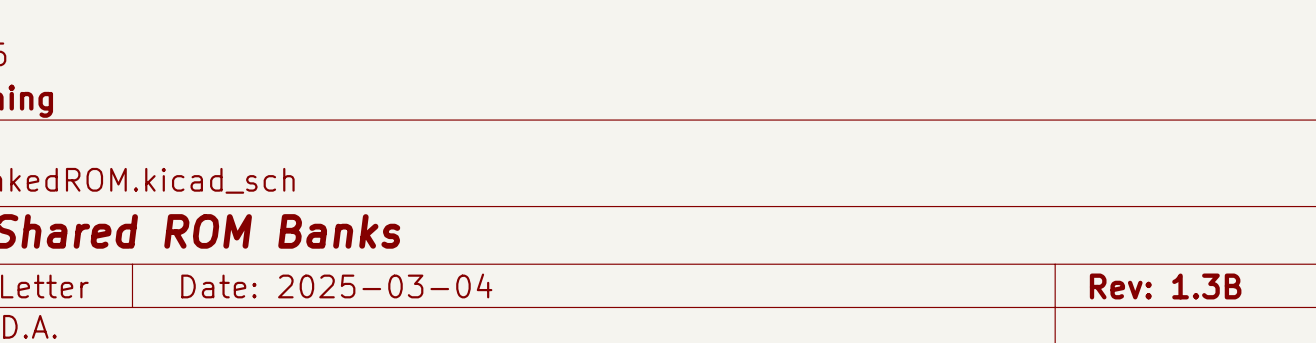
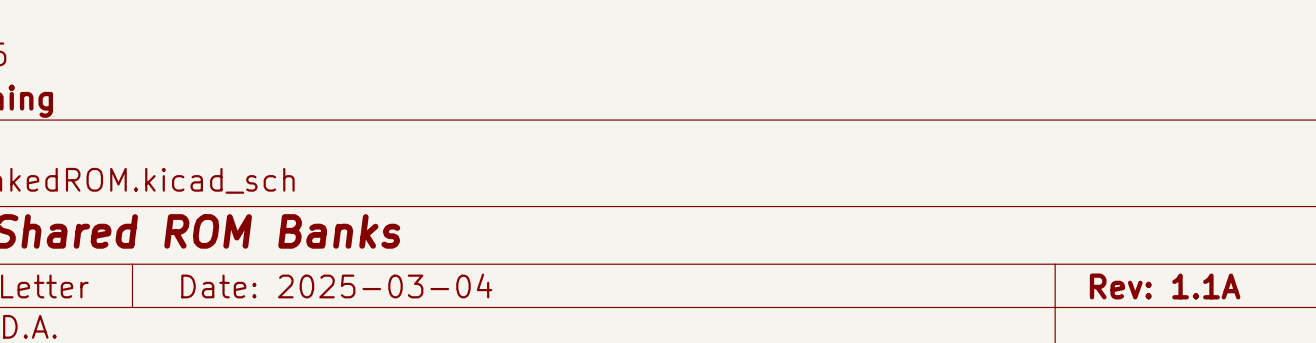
title block: Rev: 1.3B (1165, 286) -> Rev: 1.1A (1165, 286)

